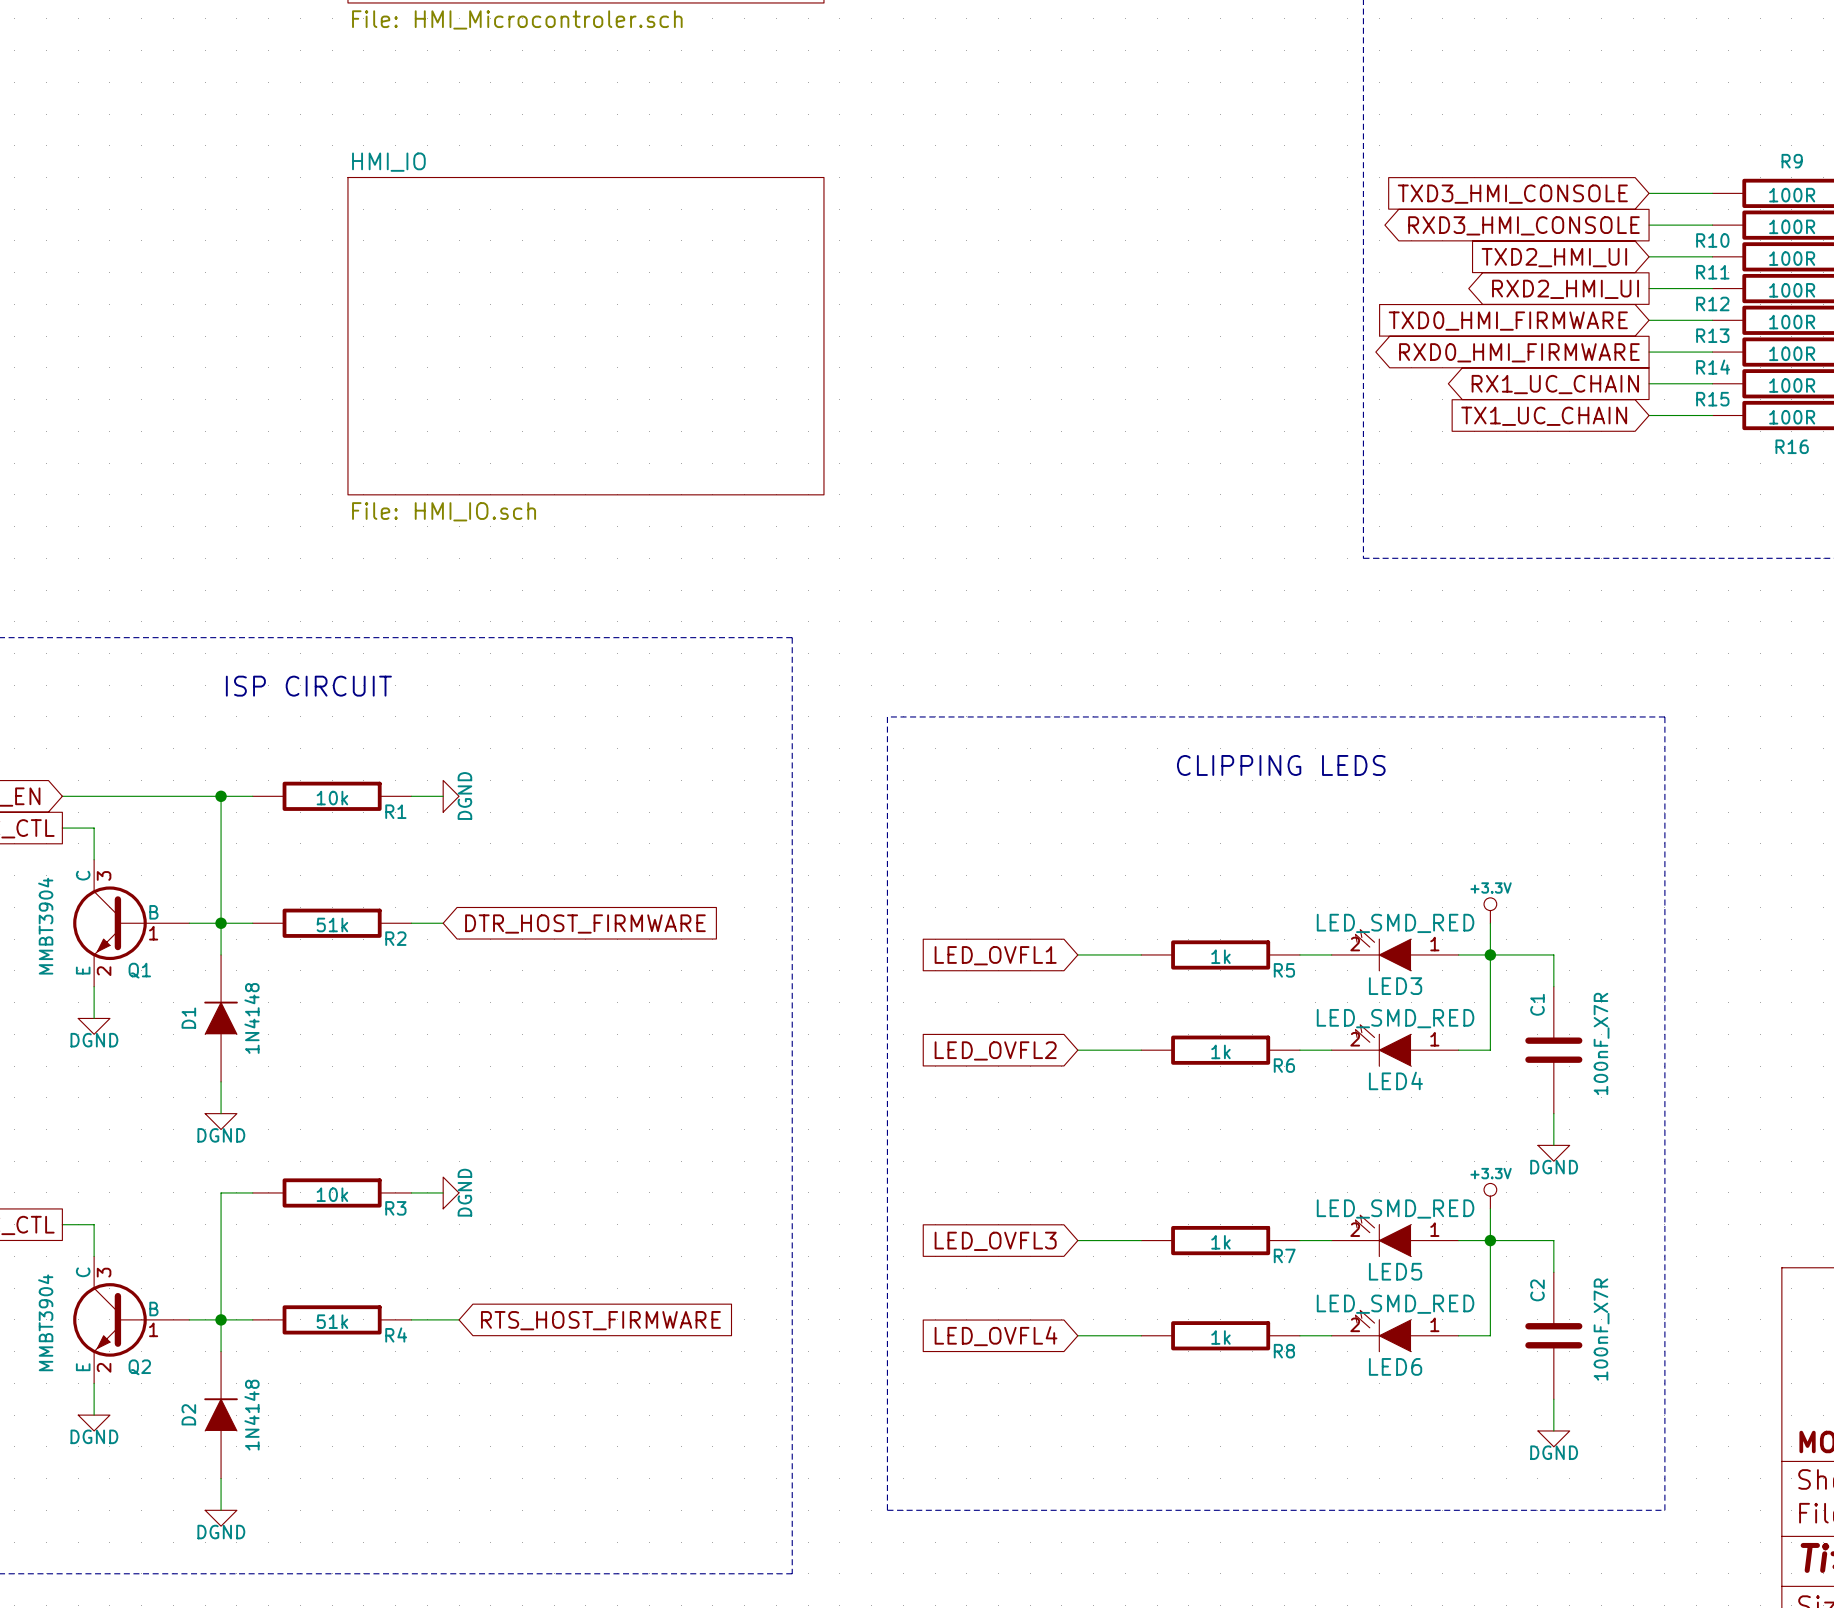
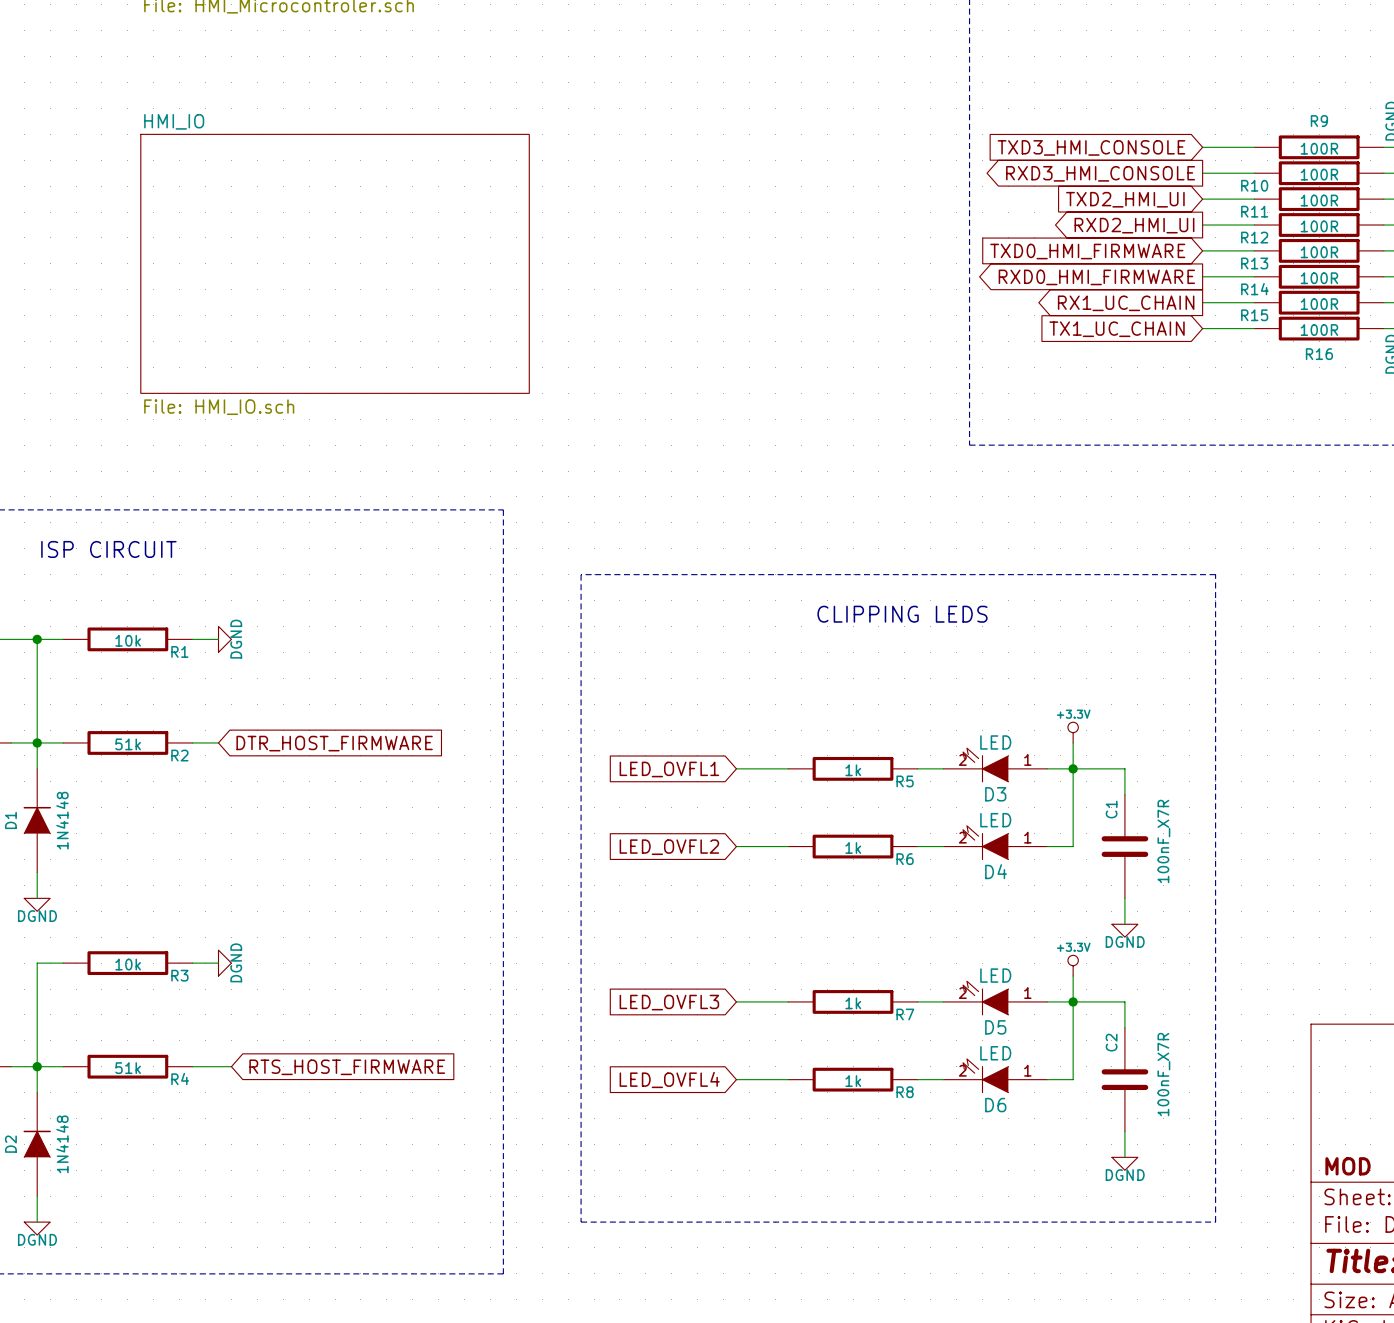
LED3 value: LED_SMD_RED (1395, 923) -> LED (995, 742)
LED3 name: LED3 (1395, 986) -> D3 (995, 794)
LED4 value: LED_SMD_RED (1395, 1018) -> LED (995, 820)
LED4 name: LED4 (1395, 1080) -> D4 (996, 871)
LED5 value: LED_SMD_RED (1395, 1209) -> LED (995, 975)
LED5 name: LED5 (1395, 1271) -> D5 (995, 1027)
LED6 value: LED_SMD_RED (1395, 1304) -> LED (995, 1053)
LED6 name: LED6 (1395, 1366) -> D6 (995, 1105)

